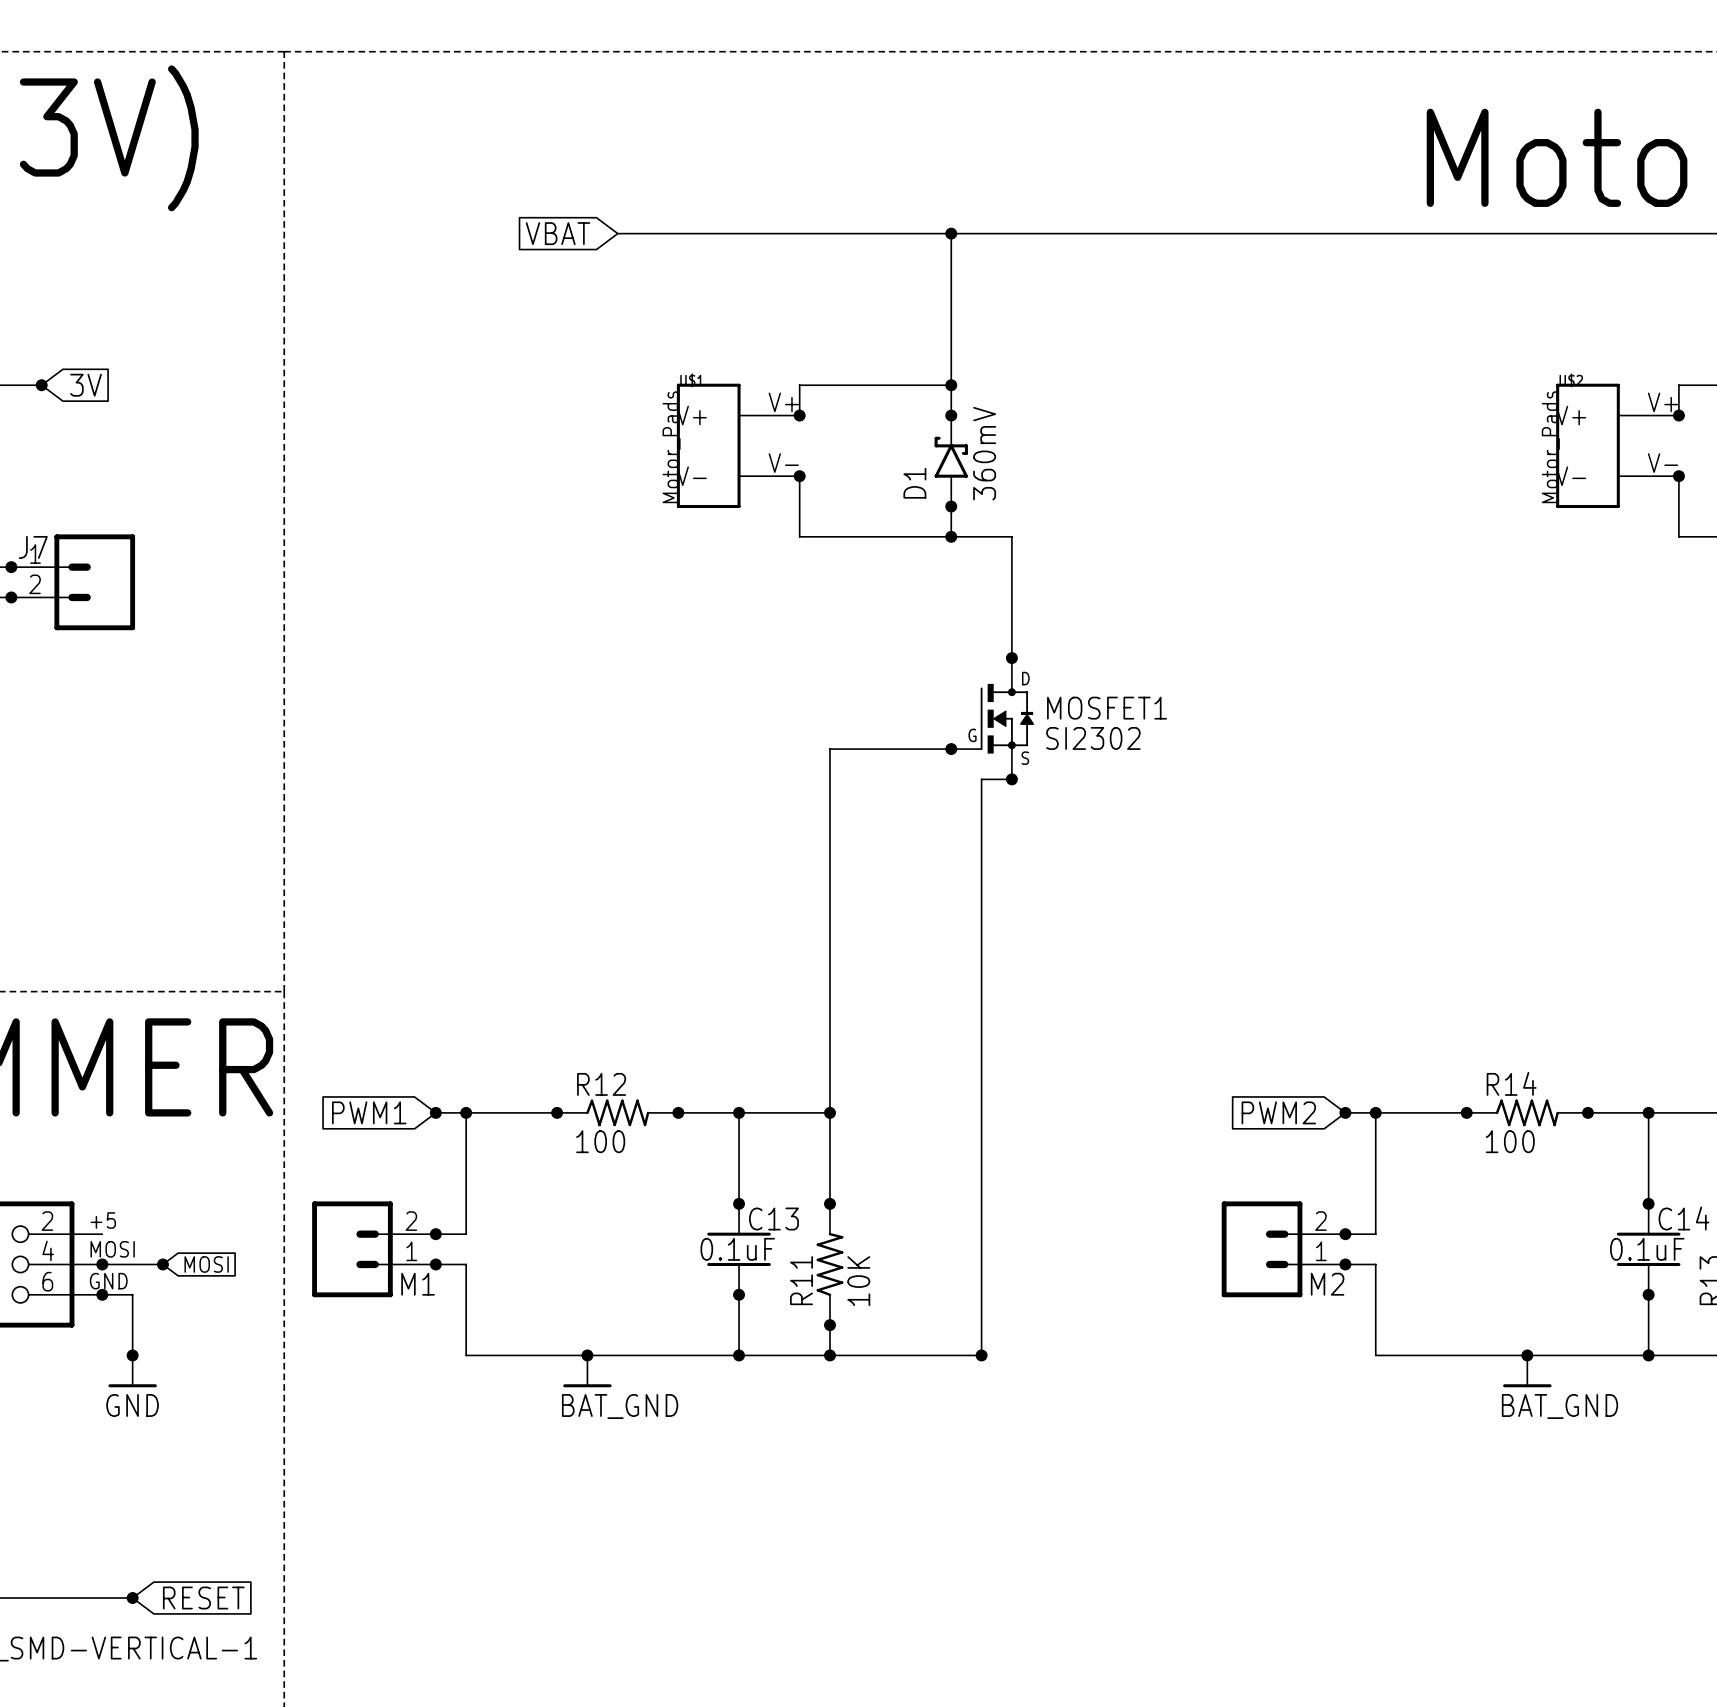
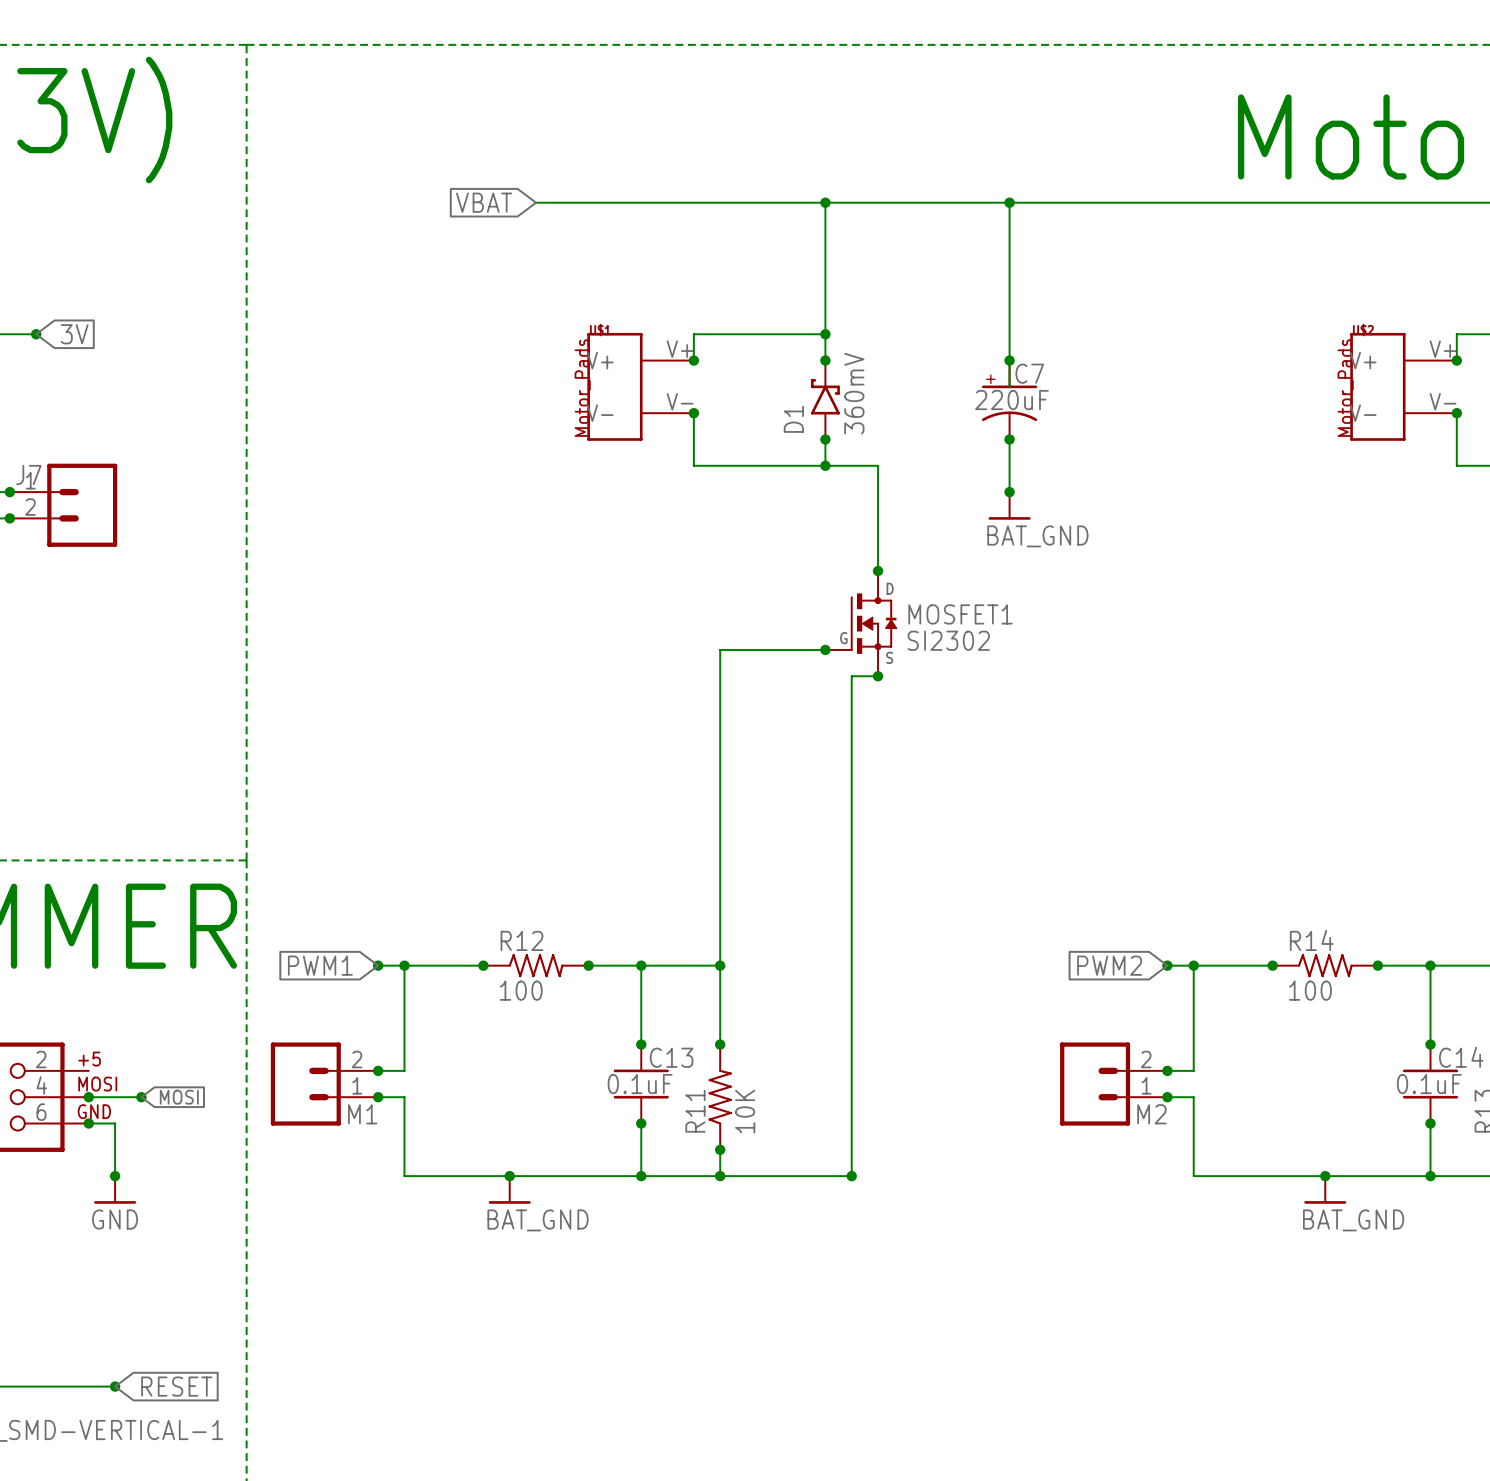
wire: none -> (1009, 202) (1009, 386)
junction: none -> (1009, 202)
junction: none -> (1009, 360)
C7: none -> 220uF (1009, 400)
wire: none -> (1009, 439) (1009, 492)
junction: none -> (1009, 439)
junction: none -> (1009, 492)
power symbol: none -> BAT_GND (1009, 505)

